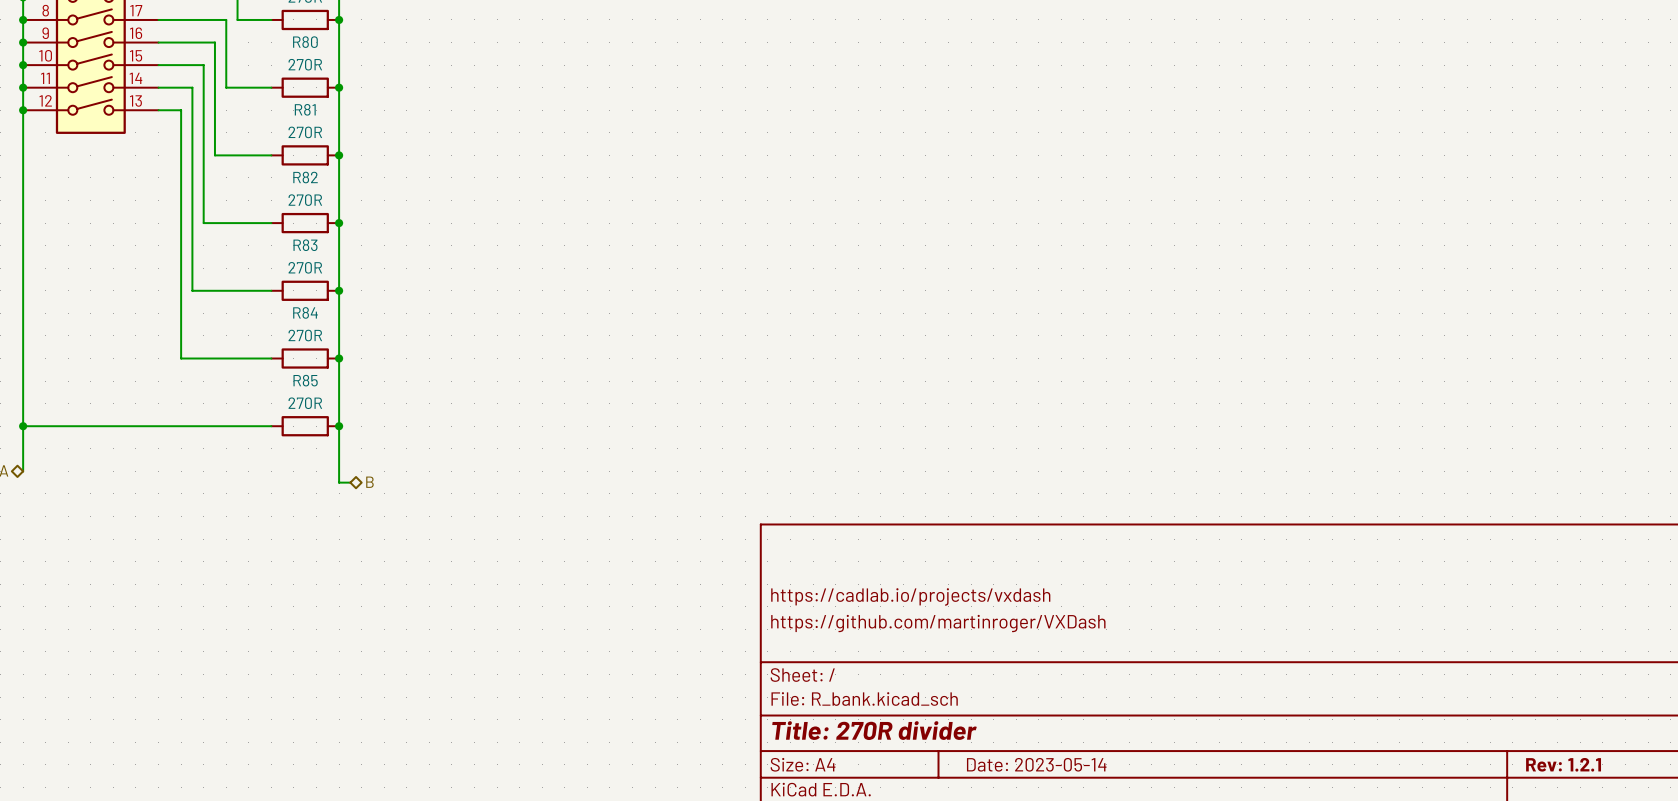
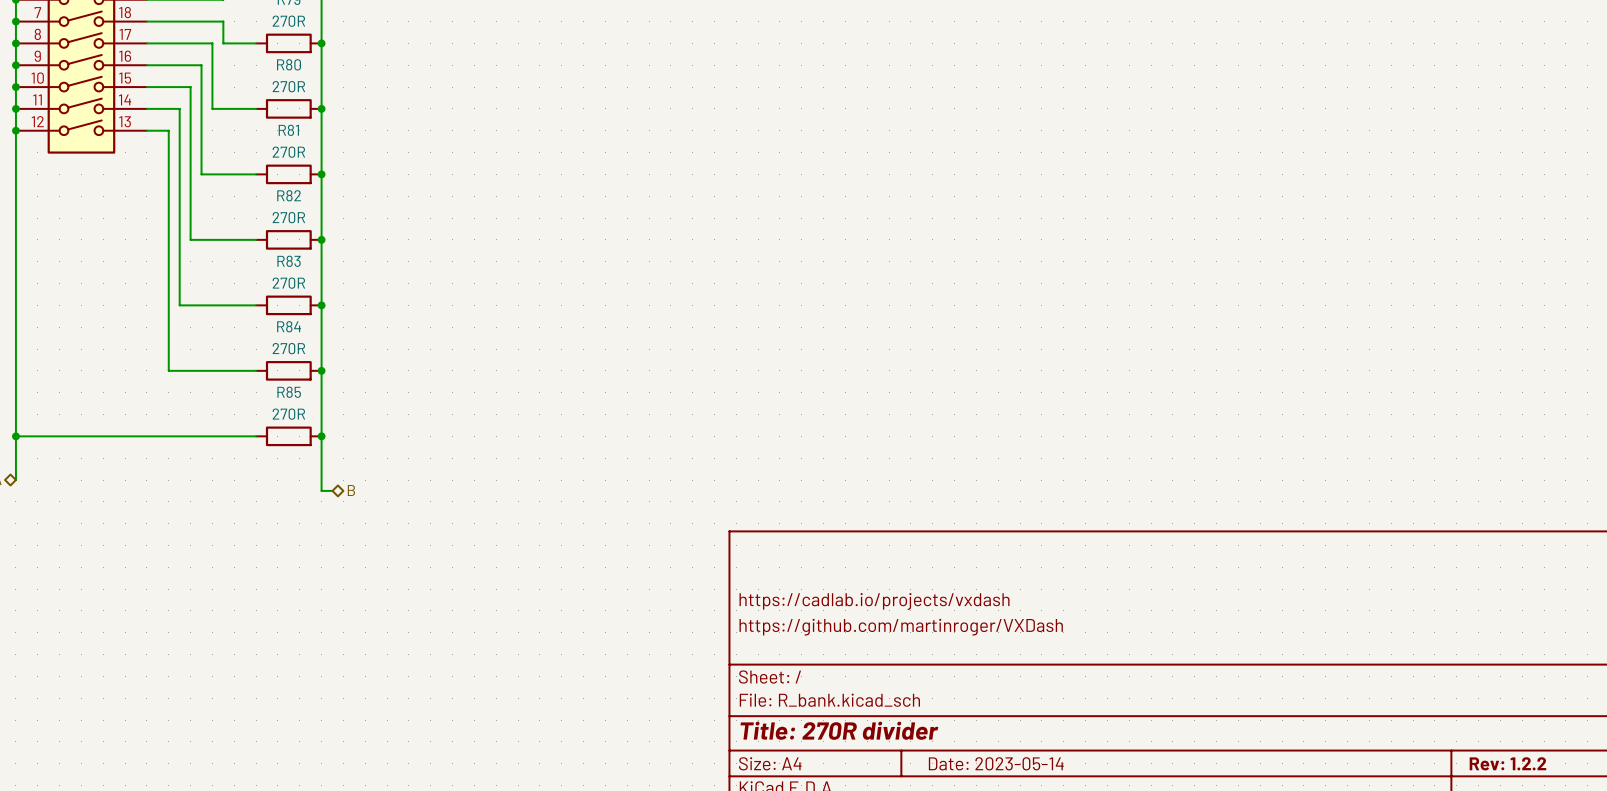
title block: Rev: 1.2.1 (1563, 764) -> Rev: 1.2.2 (1507, 763)

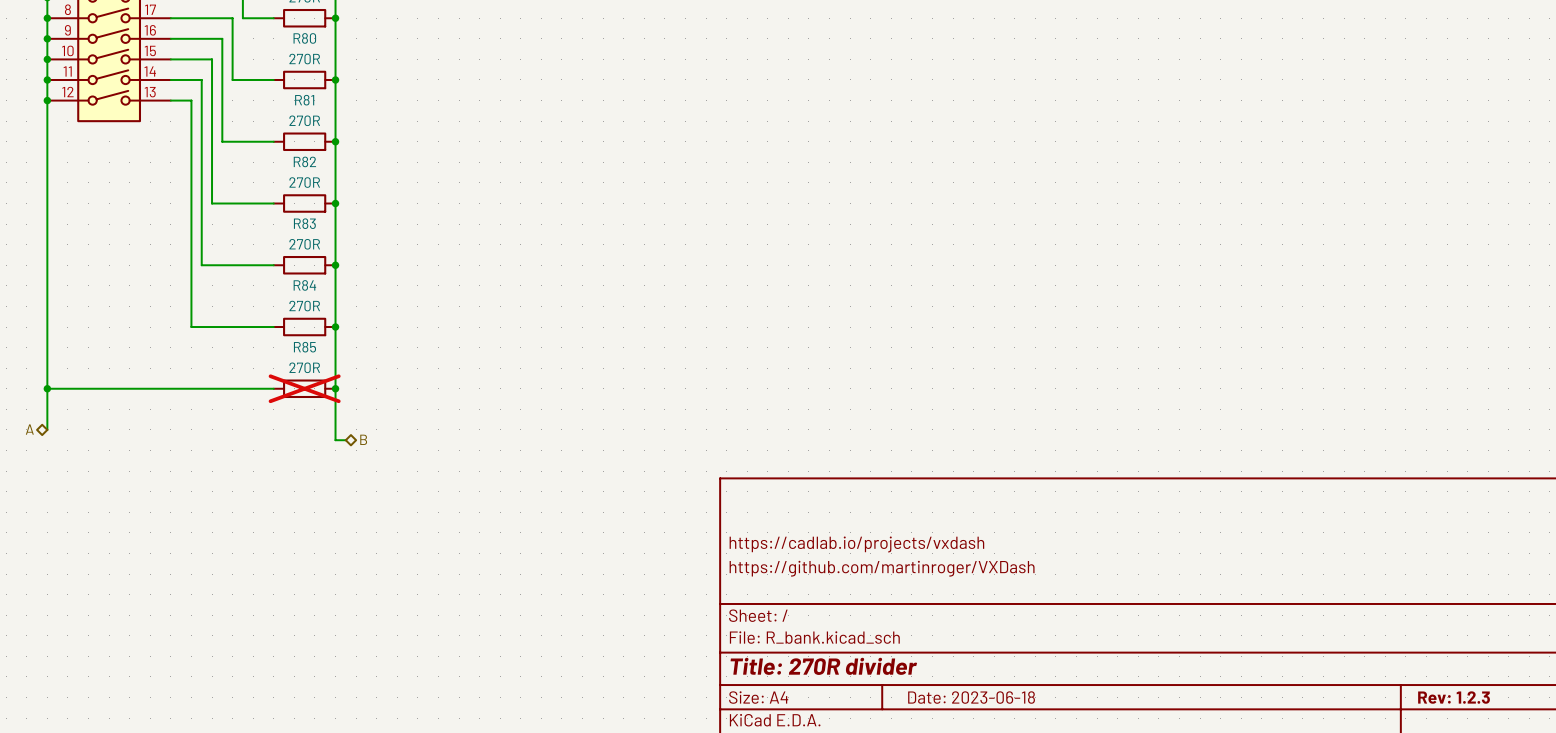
R85 do-not-place cross: none -> (304, 388)
title block: Date: 2023-05-14 (996, 763) -> Date: 2023-06-18 (971, 697)
title block: Rev: 1.2.2 (1507, 763) -> Rev: 1.2.3 (1454, 697)

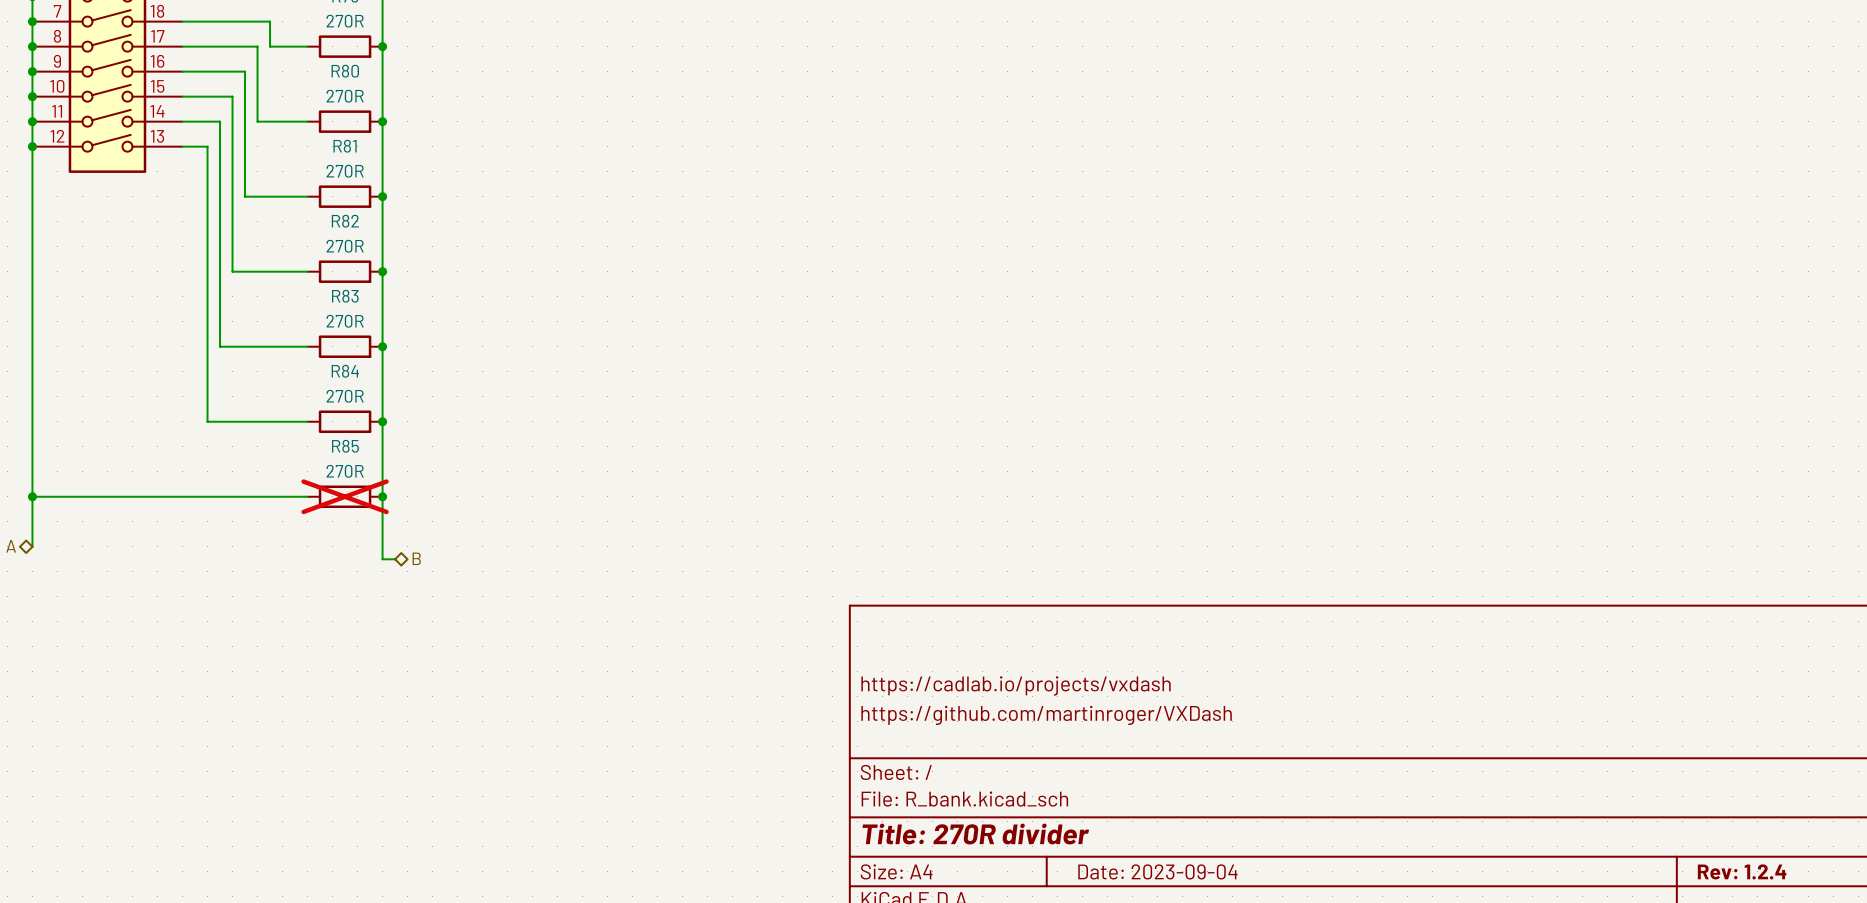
title block: Date: 2023-06-18 (971, 697) -> Date: 2023-09-04 (1157, 871)
title block: Rev: 1.2.3 (1454, 697) -> Rev: 1.2.4 (1742, 871)

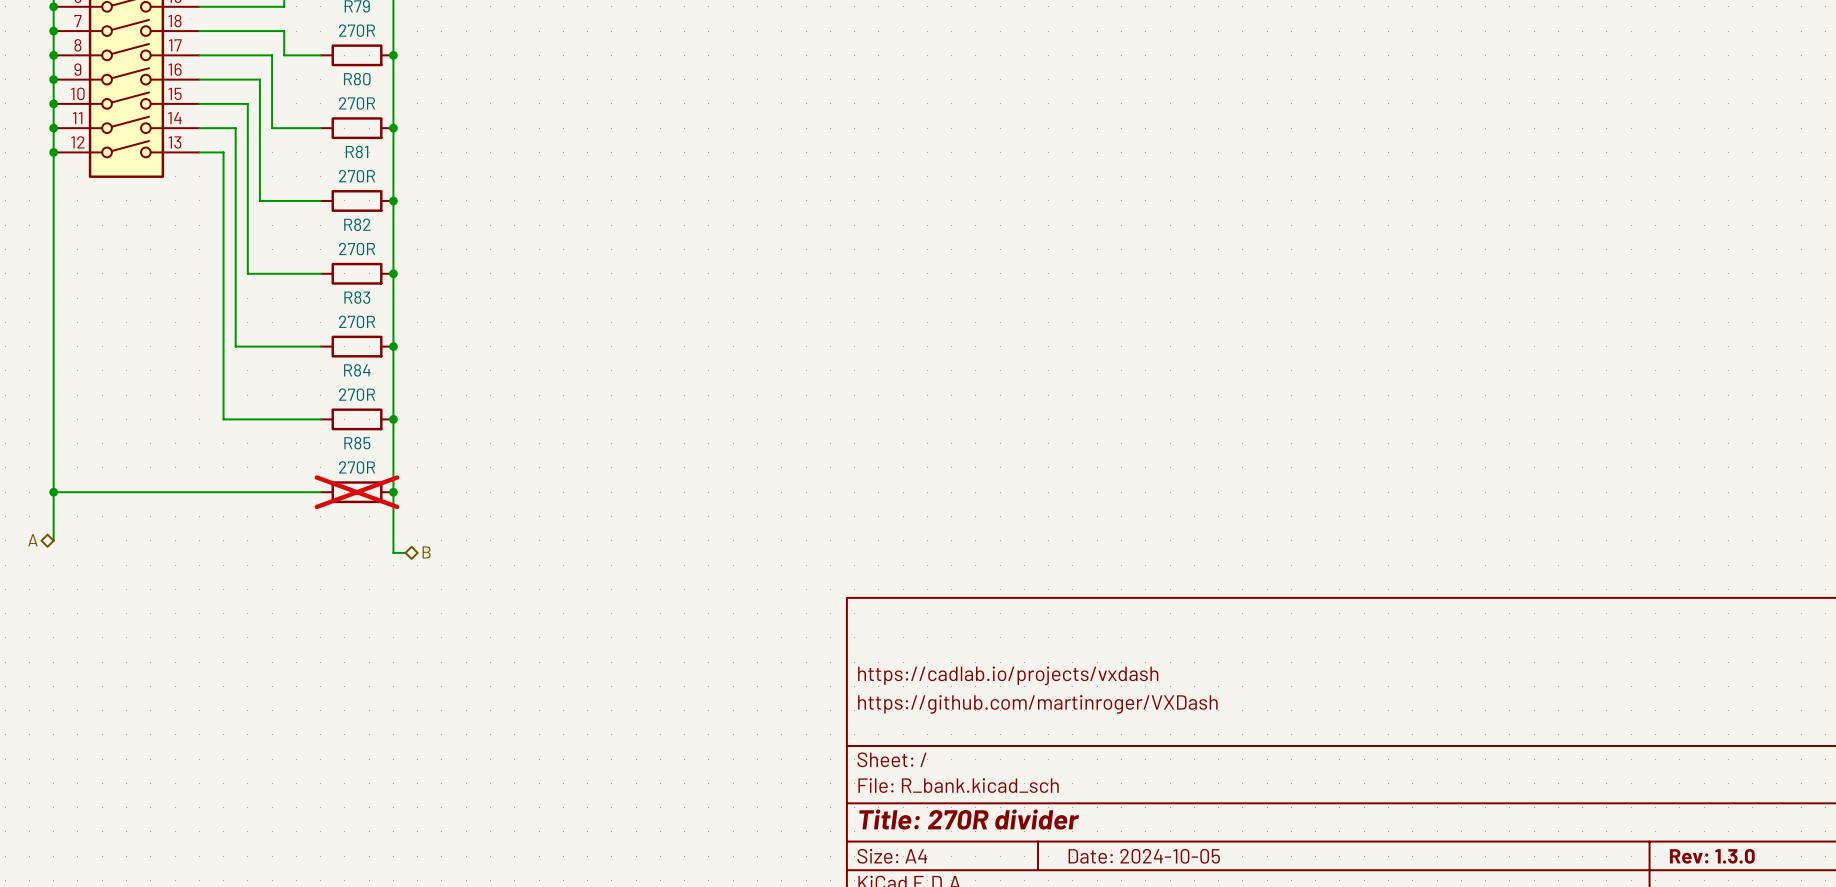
title block: Date: 2023-09-04 (1157, 871) -> Date: 2024-10-05 (1144, 856)
title block: Rev: 1.2.4 (1742, 871) -> Rev: 1.3.0 (1712, 856)

